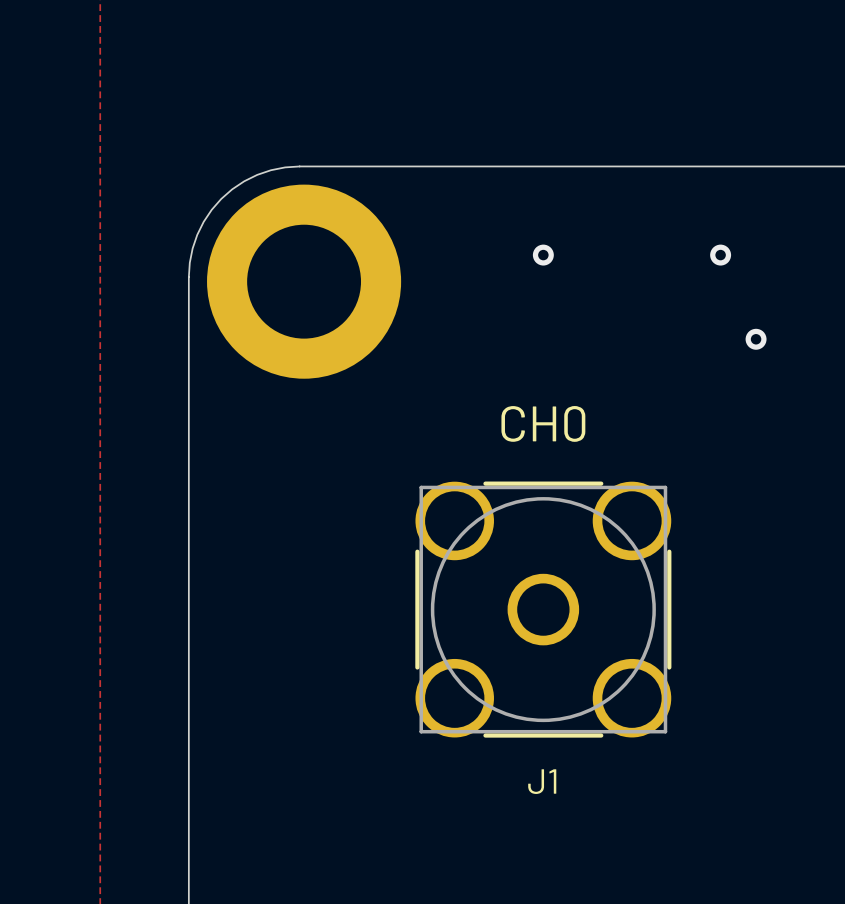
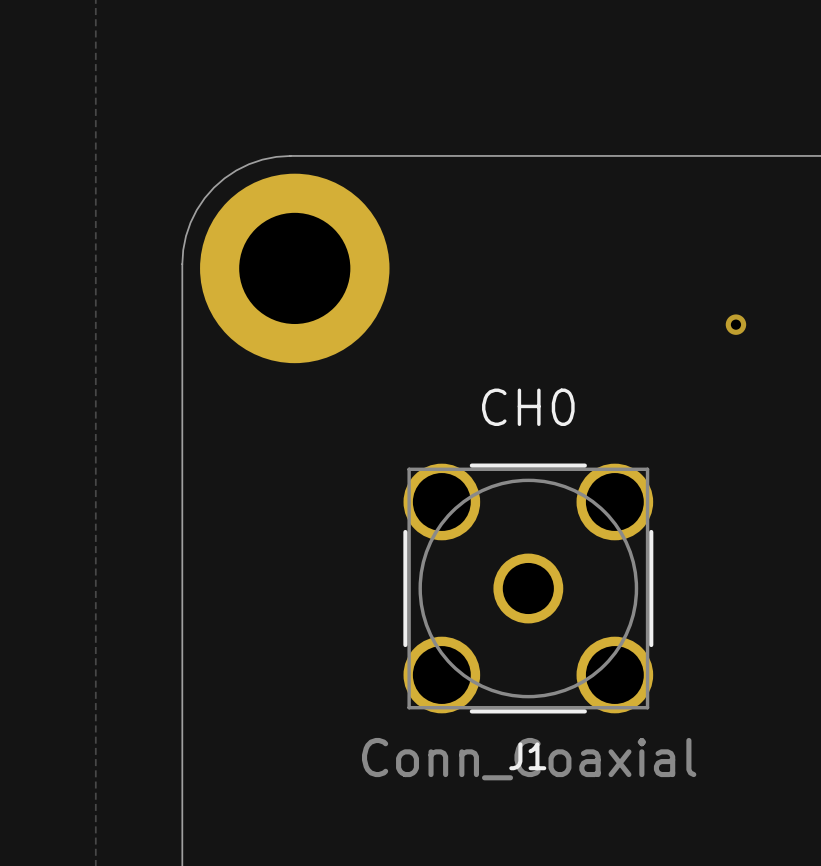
via: (543, 255) -> none
via: (720, 255) -> none
J1 value: none -> Conn_Coaxial (529, 759)

